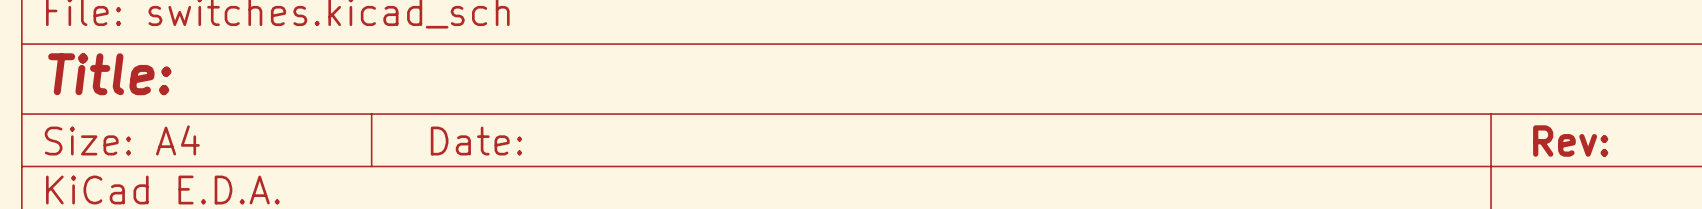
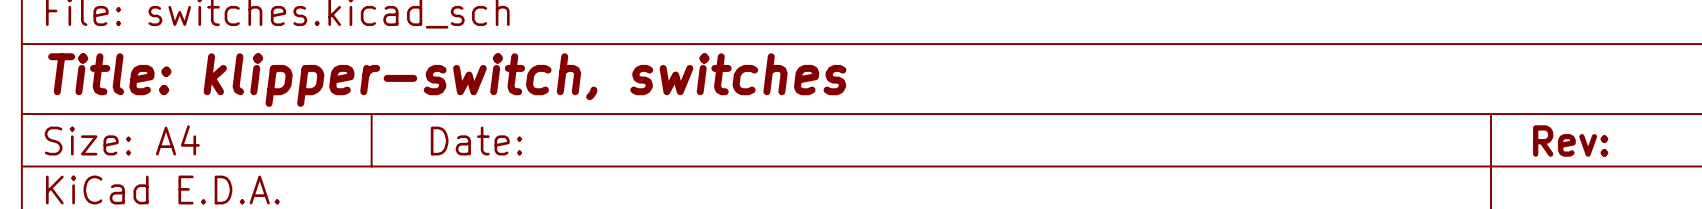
title block: Title: (109, 74) -> Title: klipper-switch, switches (447, 80)

